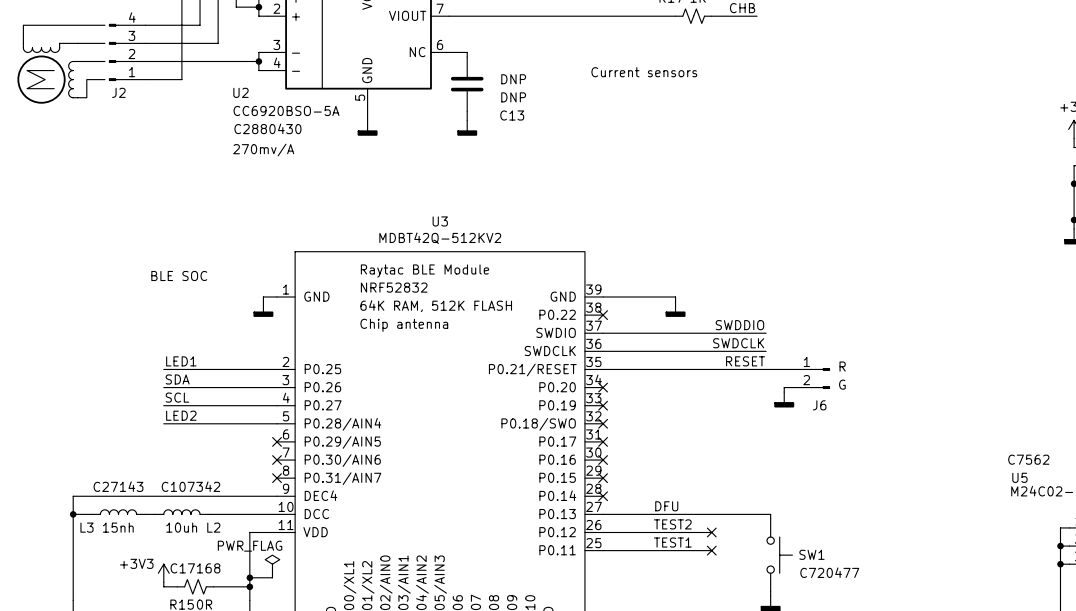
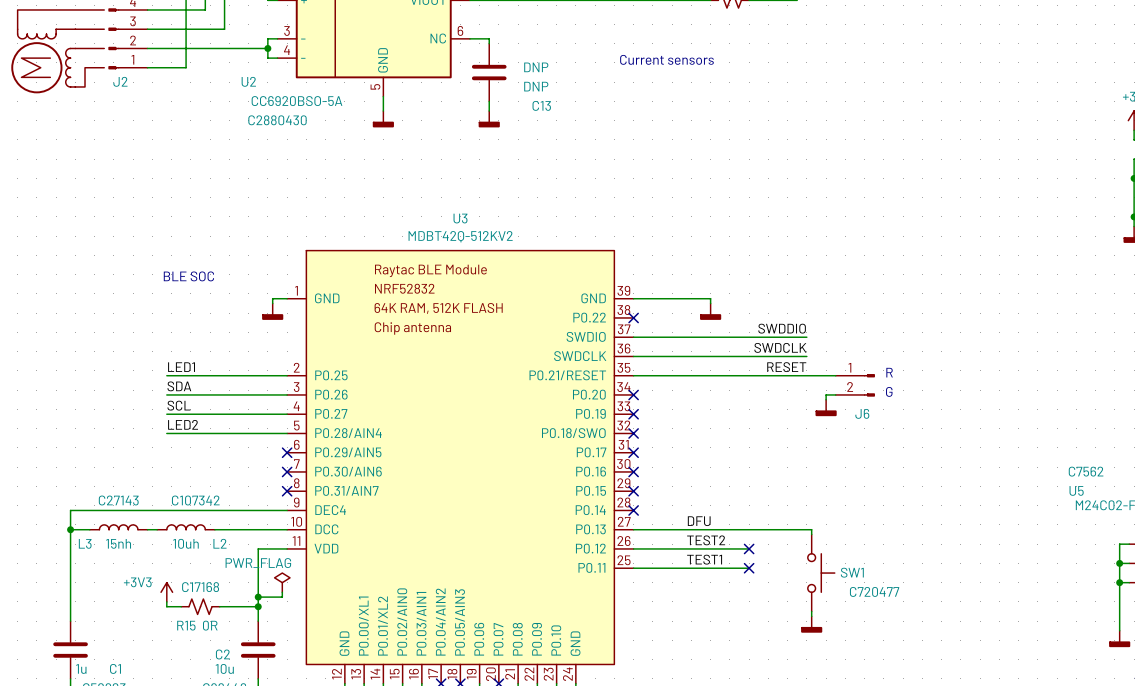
text: 270mv/A (263, 150) -> none

